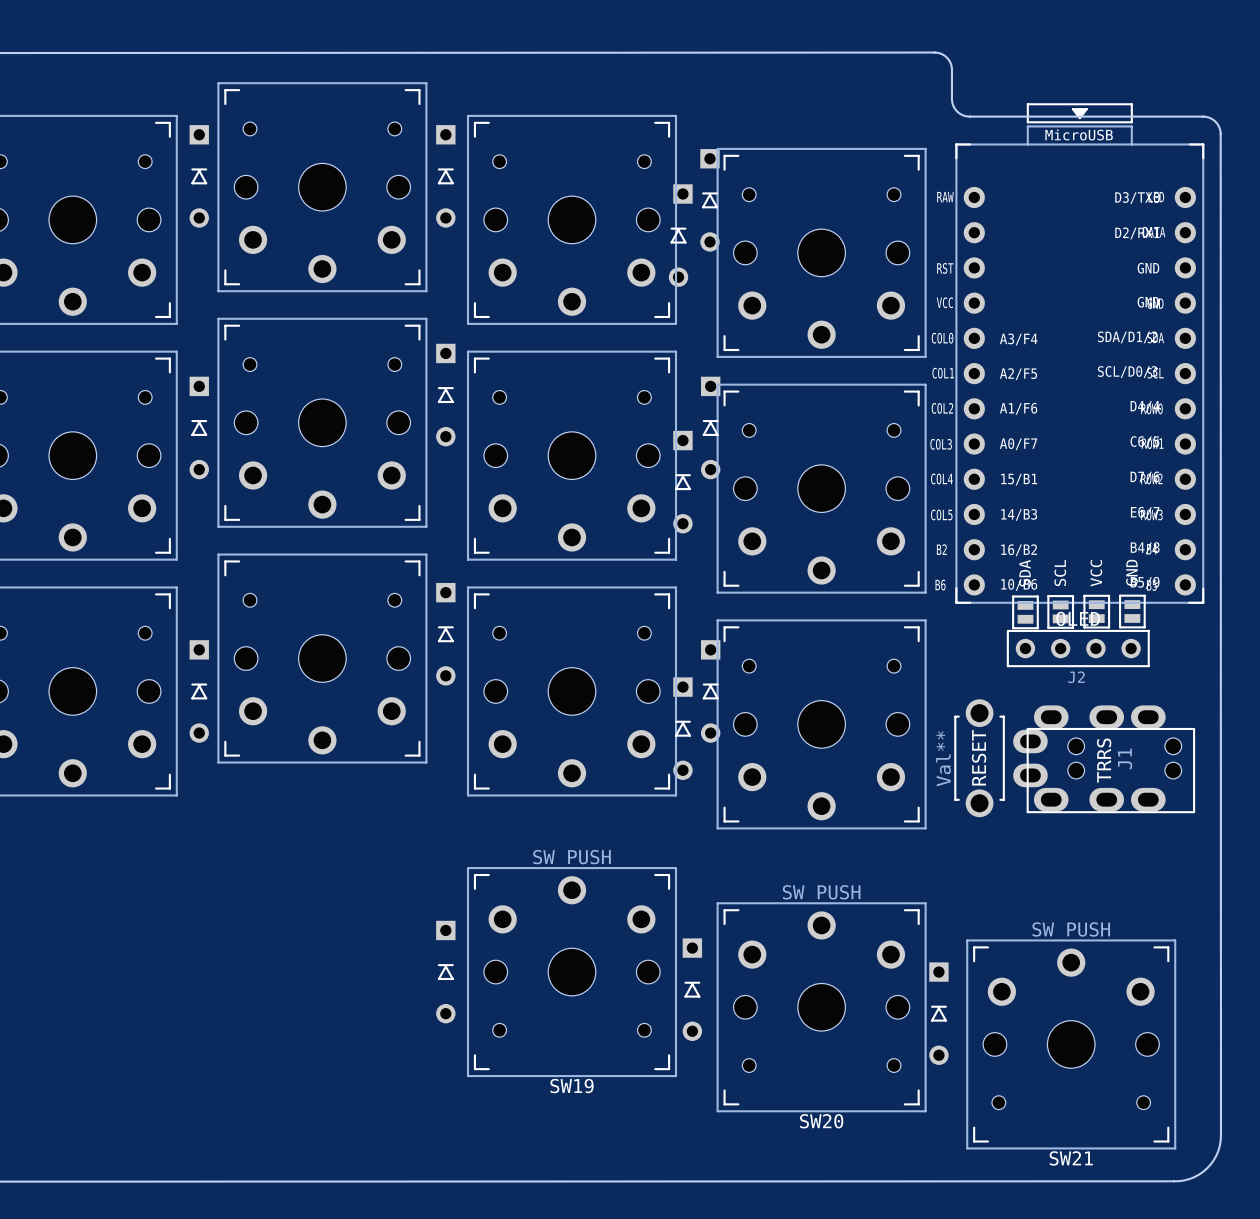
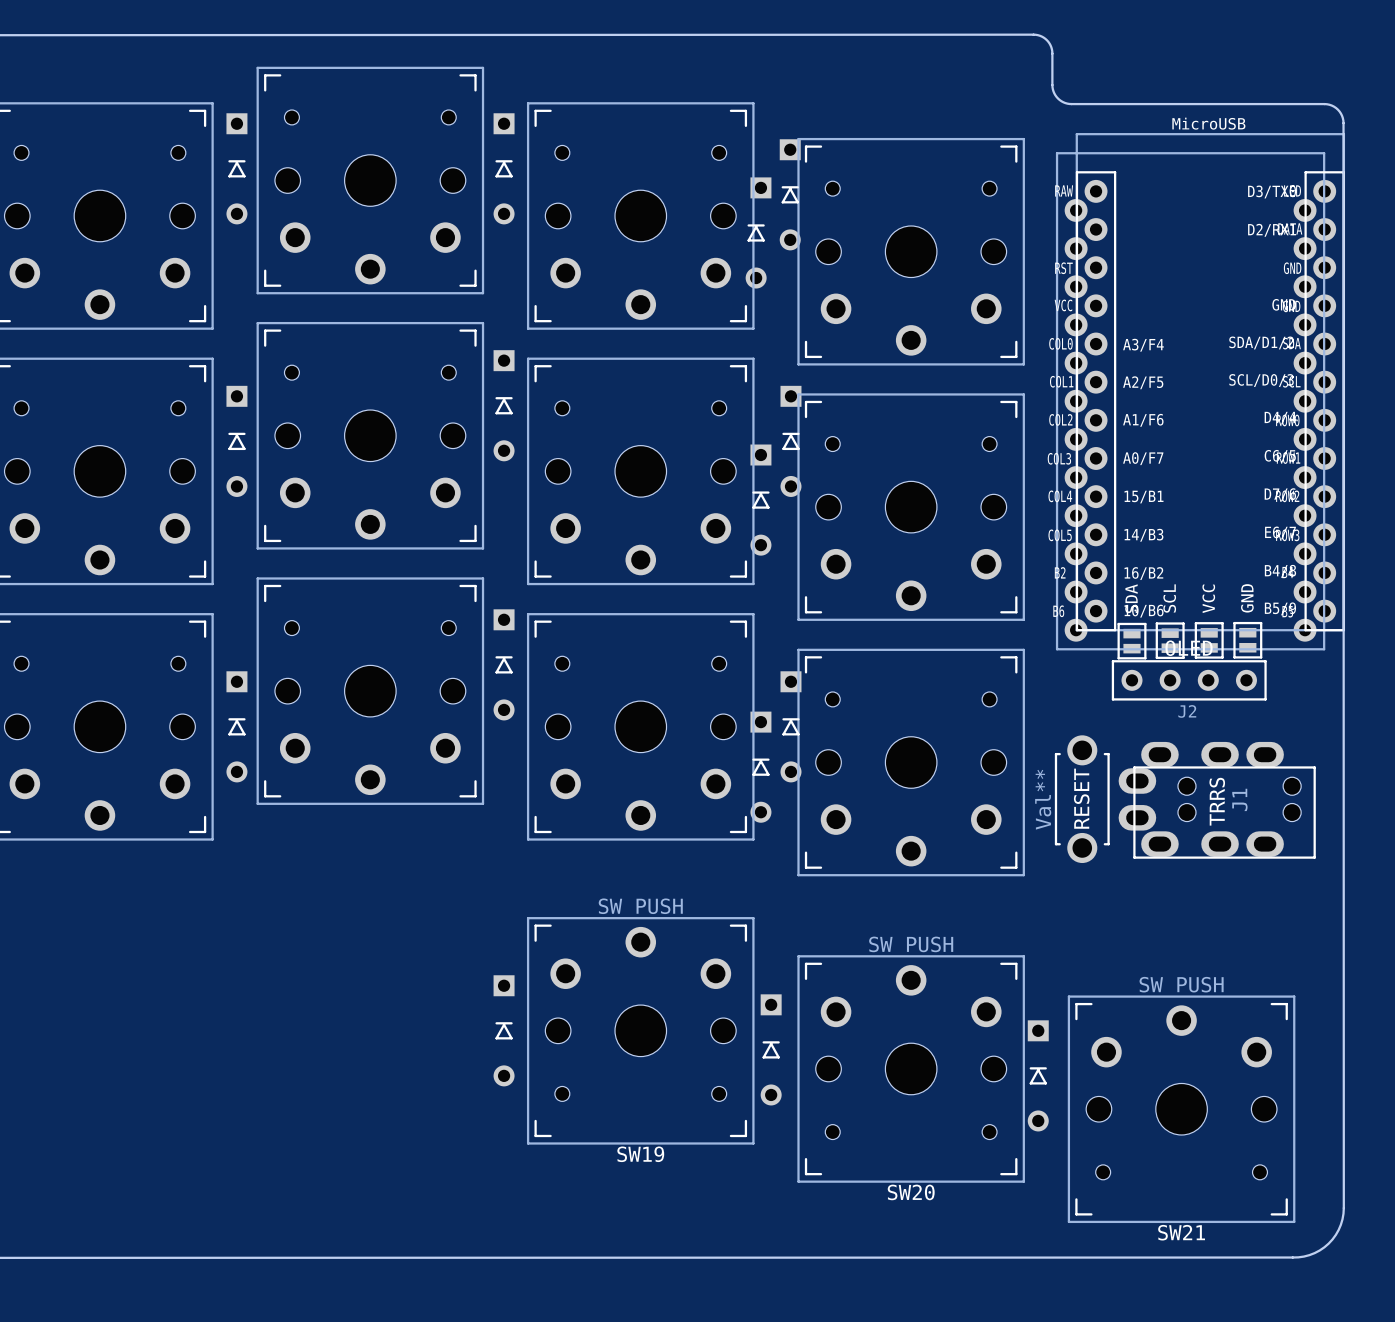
part: (1079, 353) -> none
part: none -> (1200, 391)

